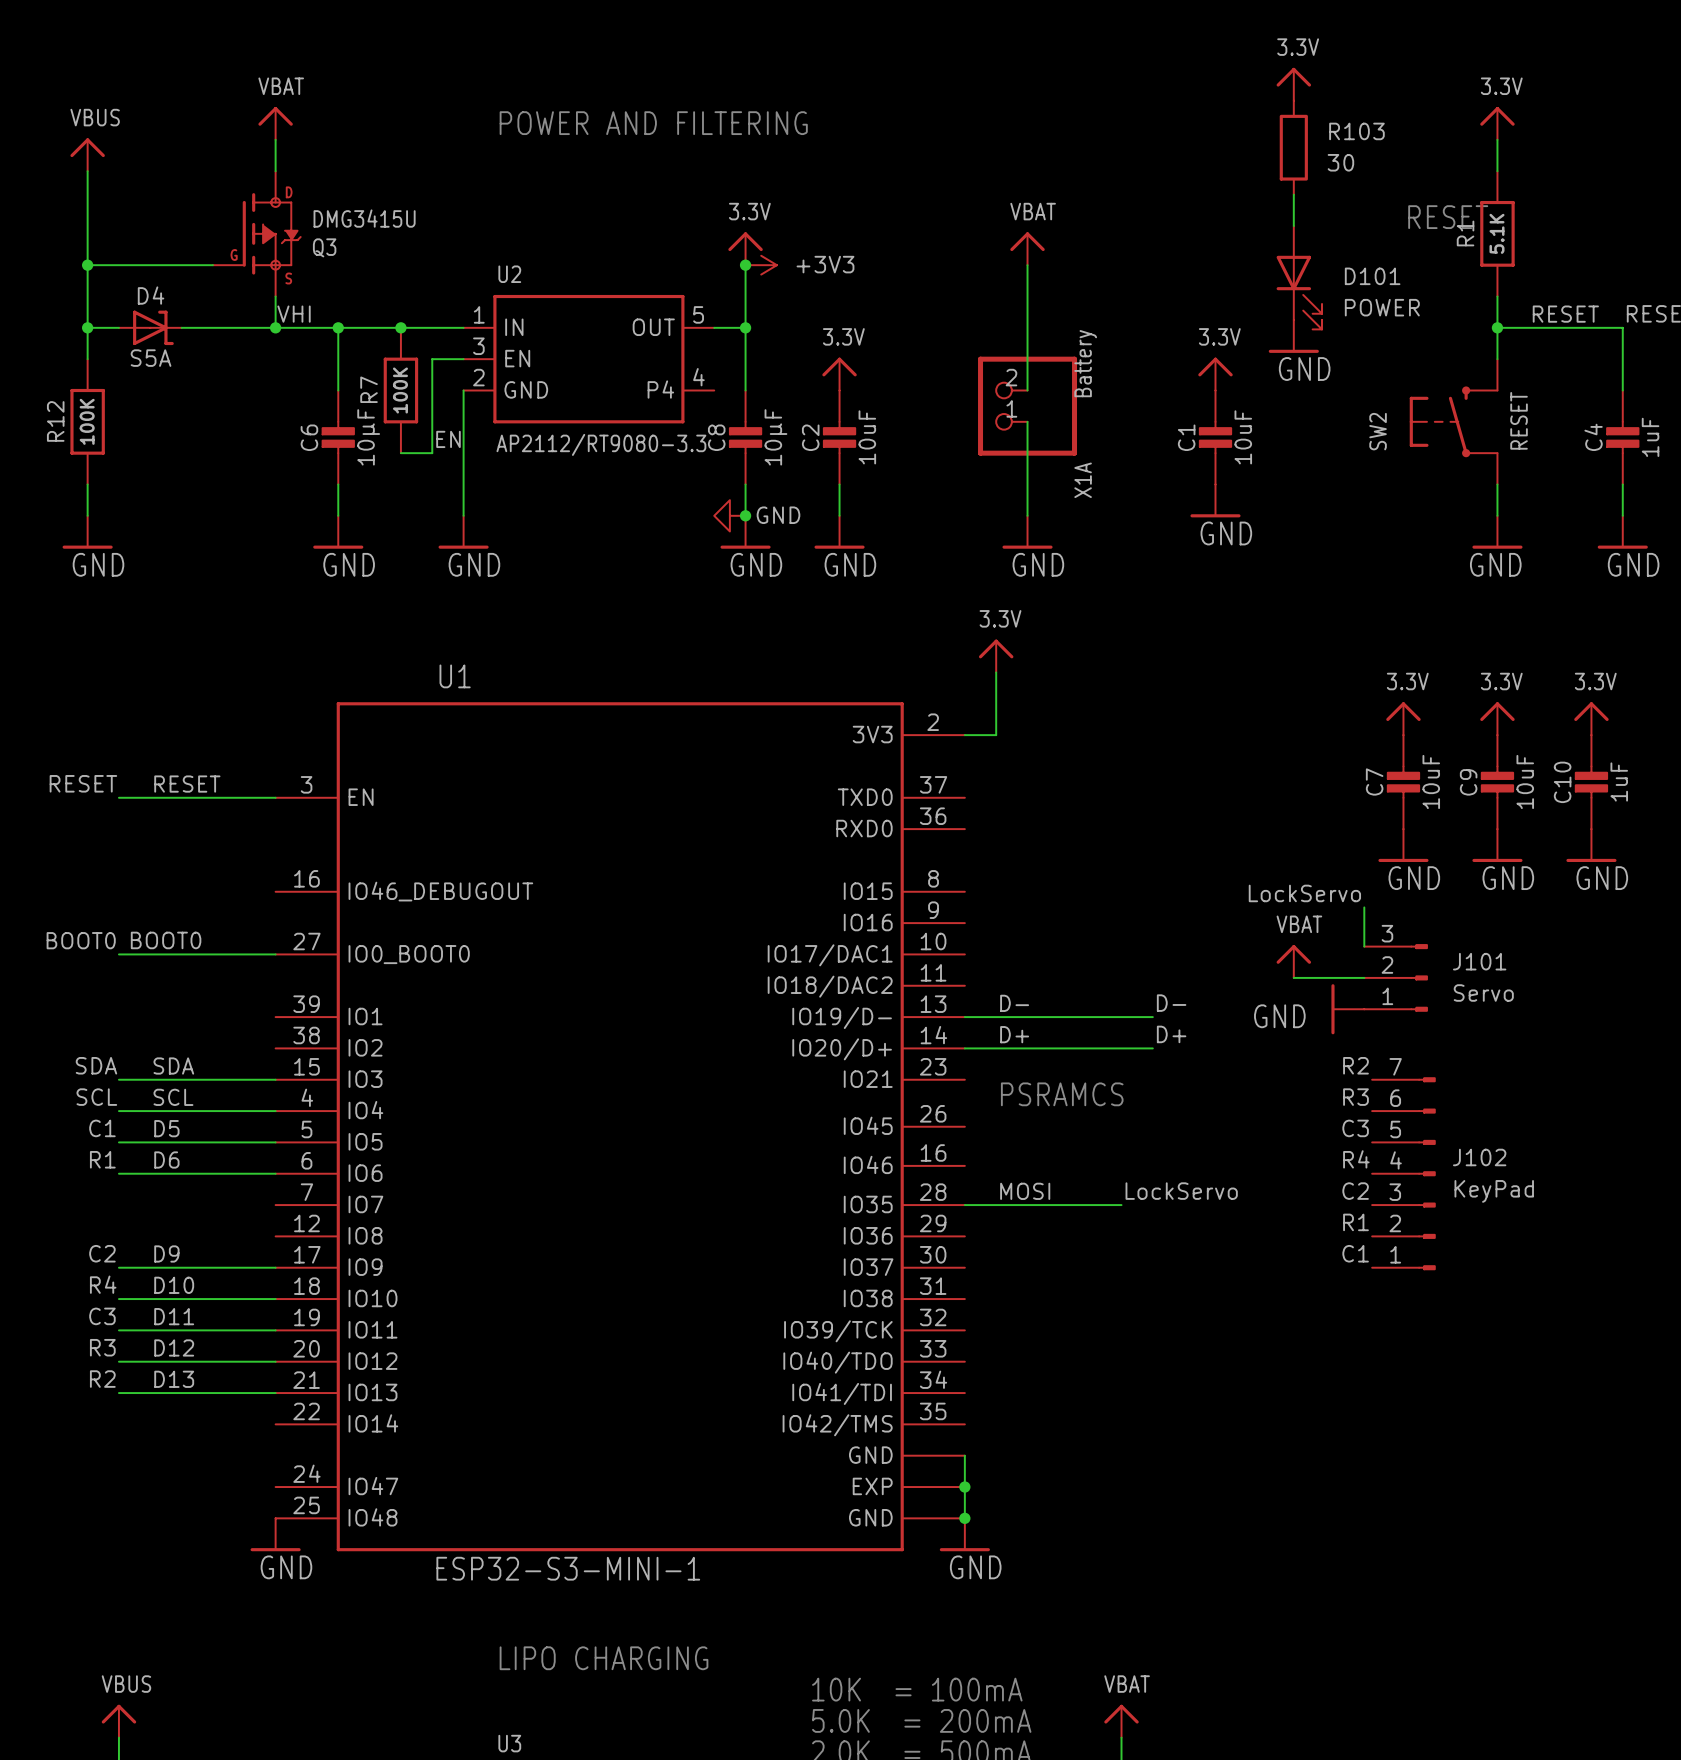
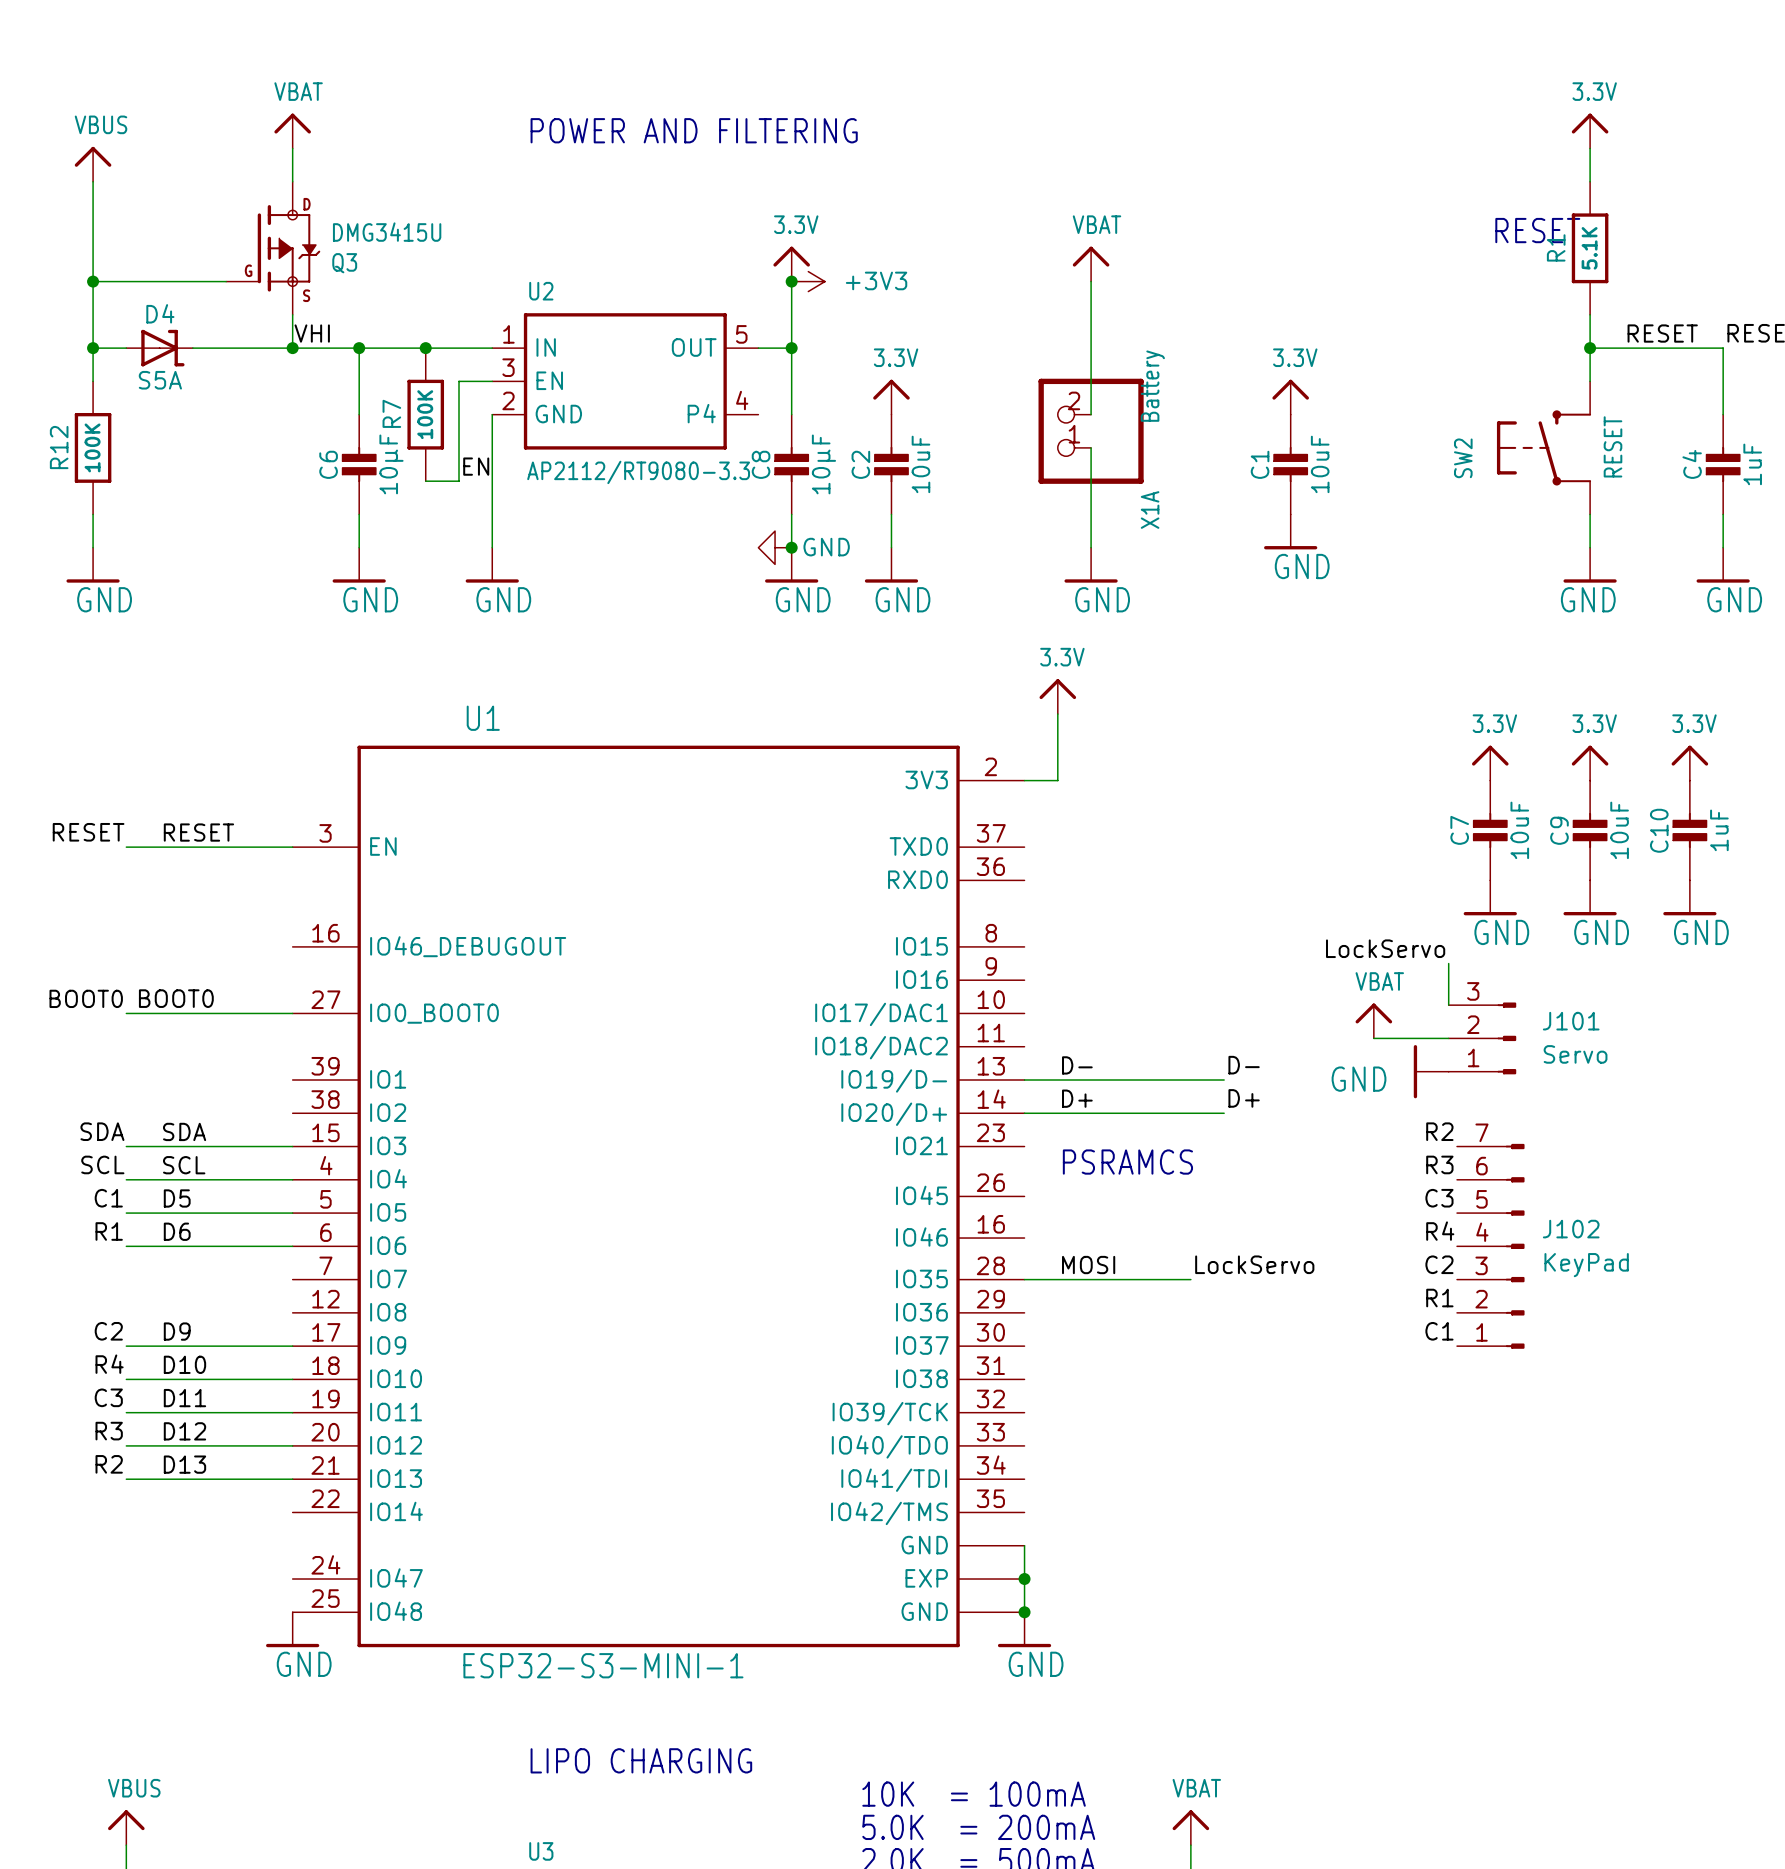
power symbol: 3.3V (1293, 84) -> none
R103: 30 (1293, 147) -> none
wire: (1293, 194) (1293, 226) -> none
D101: POWER (1299, 277) -> none
power symbol: GND (1293, 336) -> none

